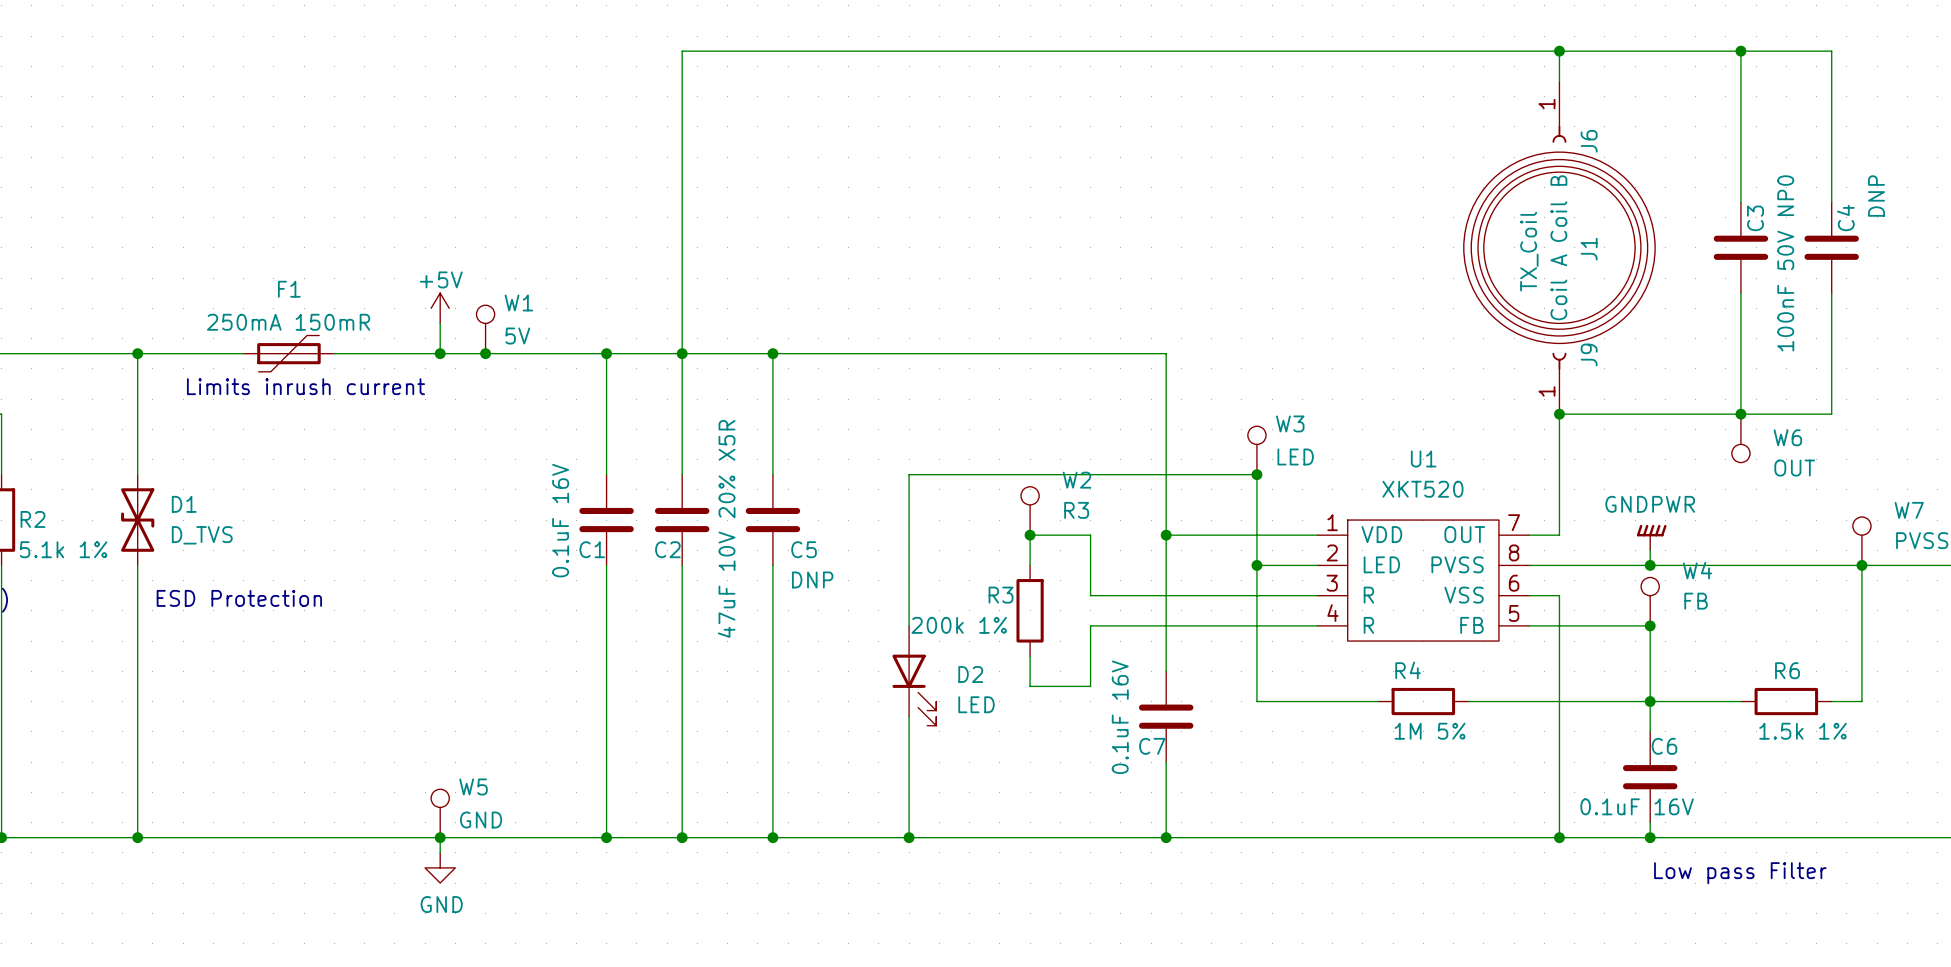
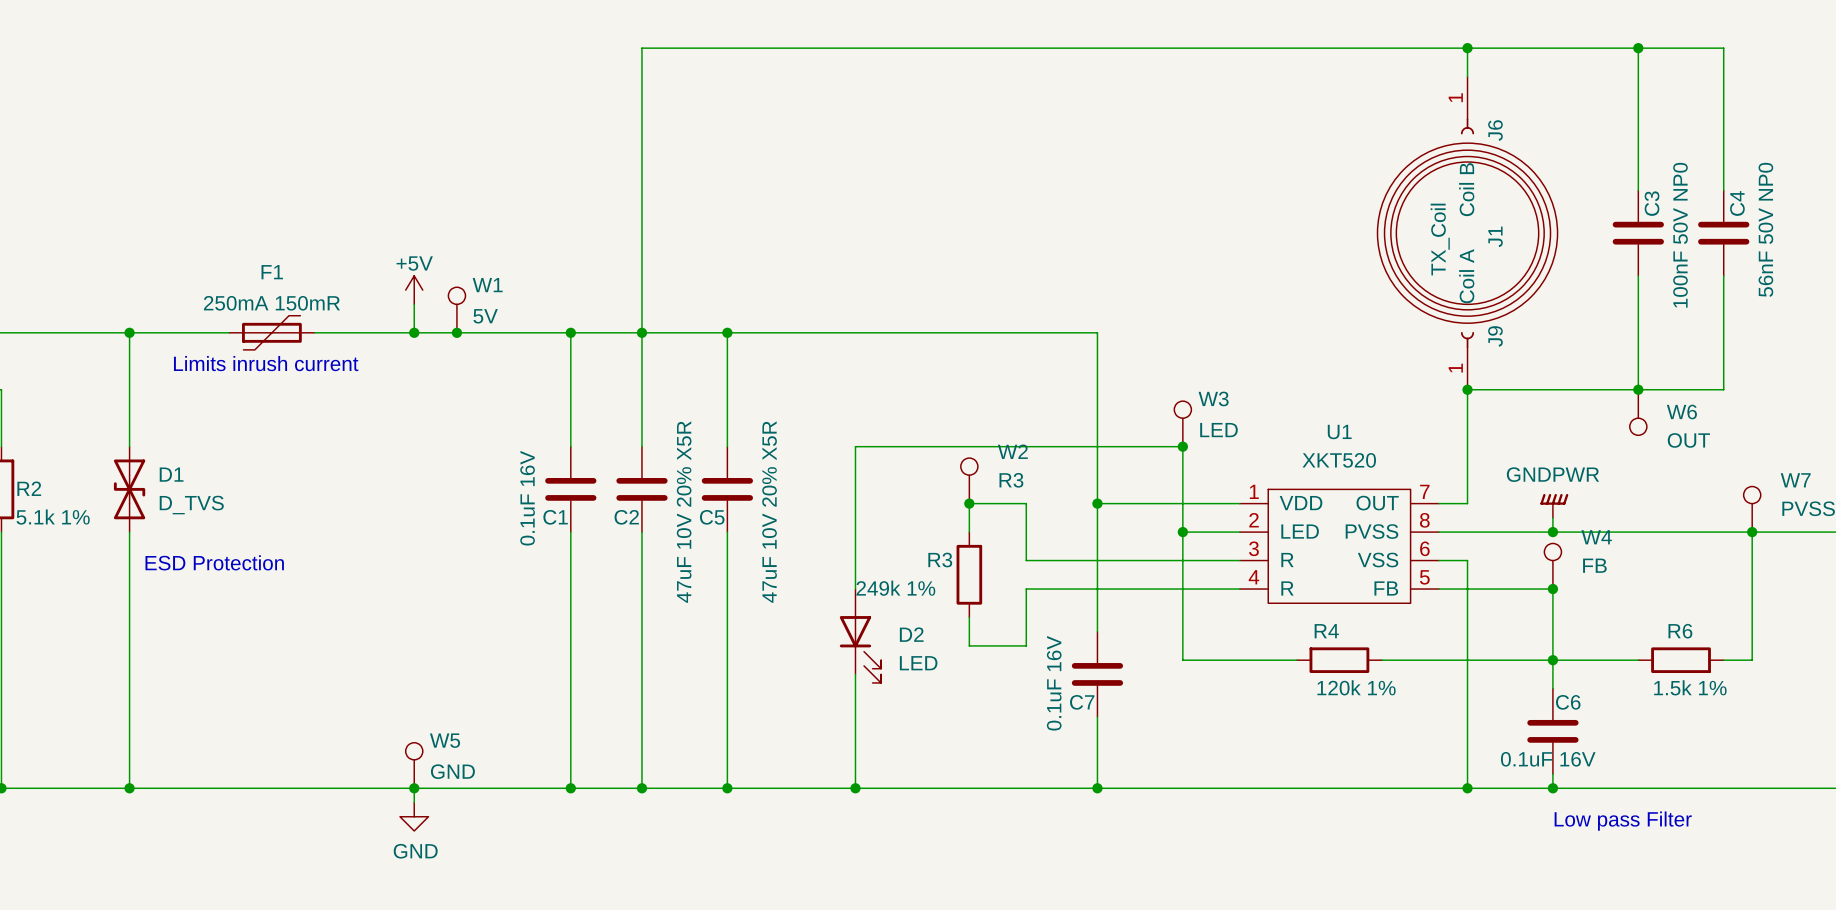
C4 value: DNP (1876, 196) -> 56nF 50V NP0 (1765, 229)
C5 name position: C5 (804, 549) -> C5 (712, 517)
C5 value: DNP (812, 579) -> 47uF 10V 20% X5R (769, 512)
R3 value: 200k 1% (959, 625) -> 249k 1% (895, 588)
R4 value: 1M 5% (1430, 731) -> 120k 1% (1356, 687)

